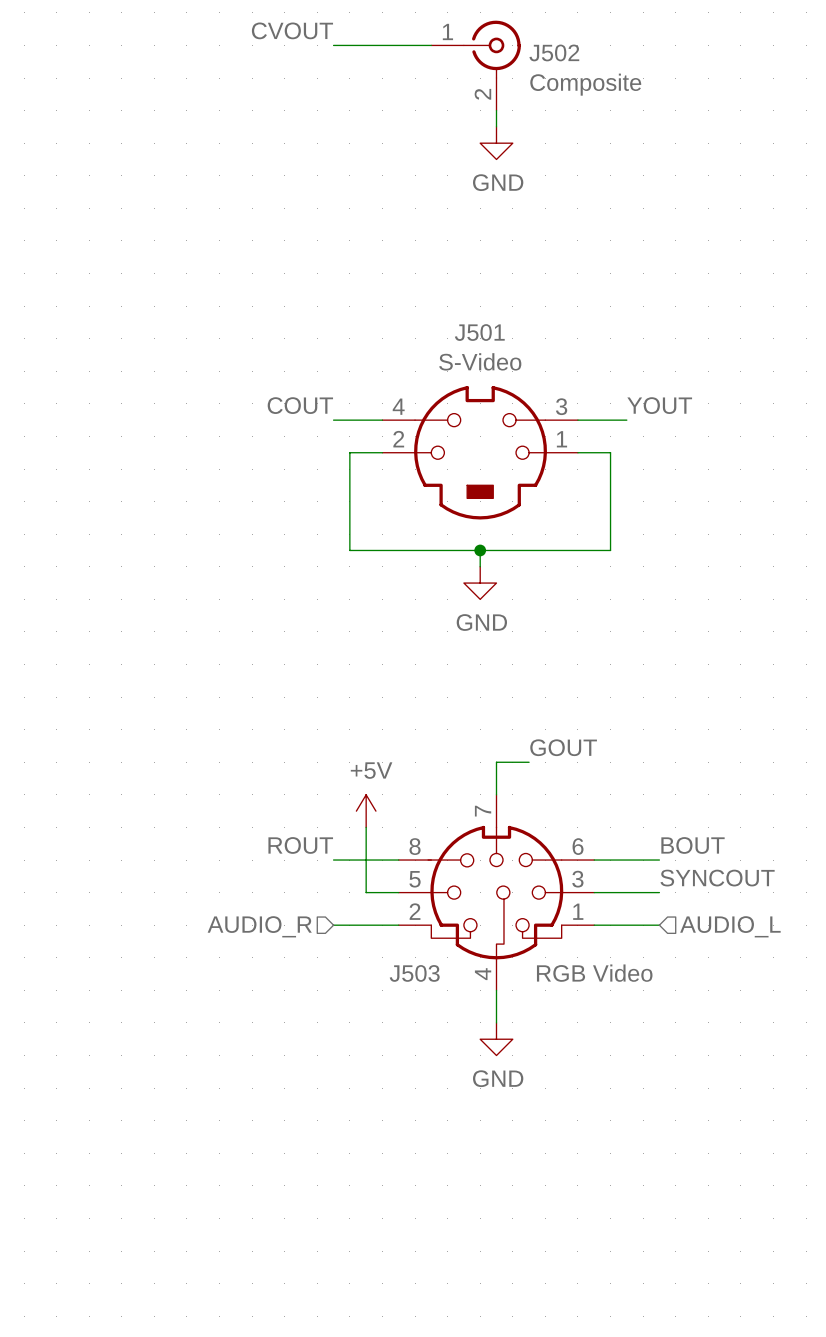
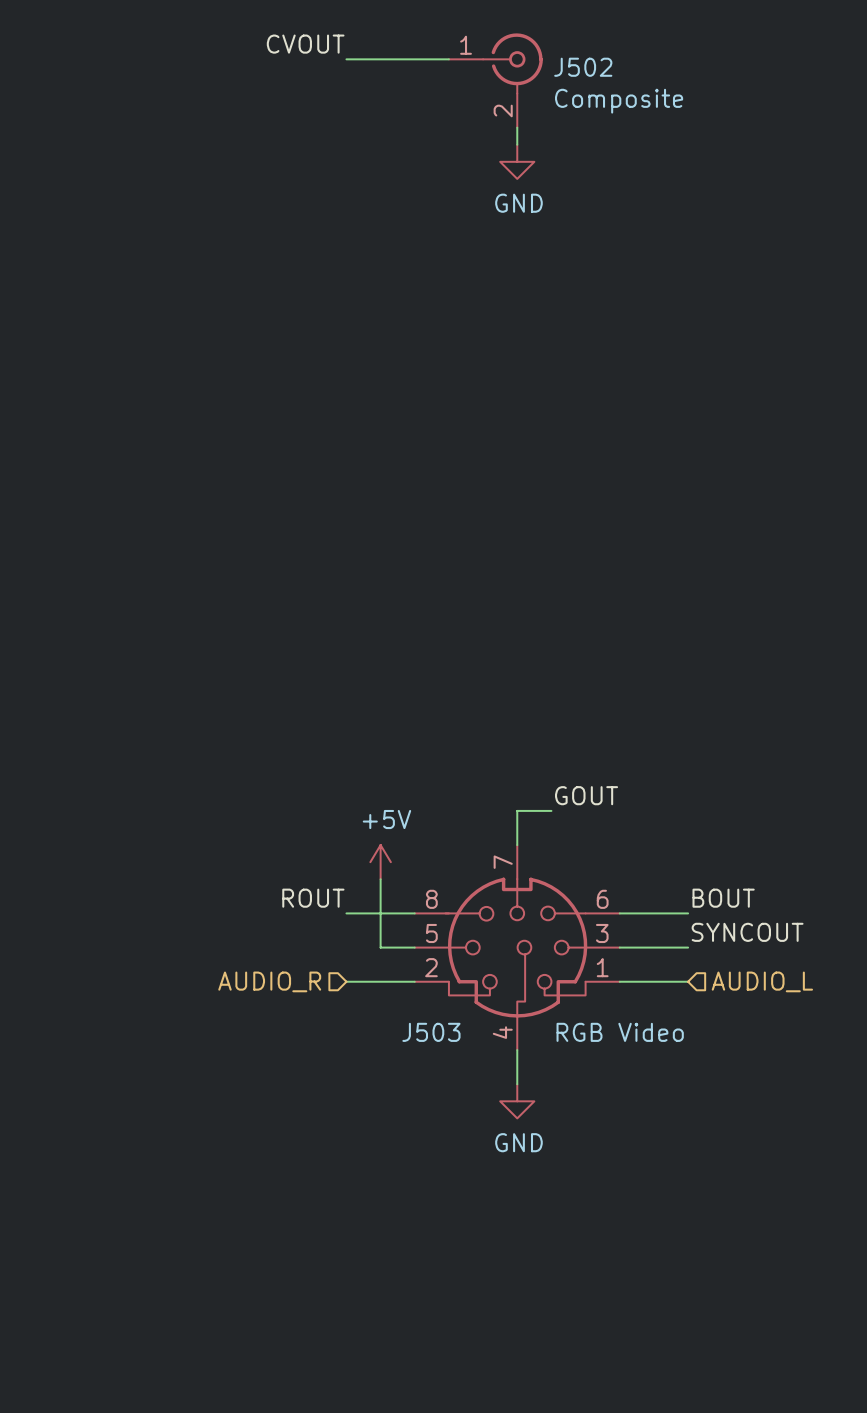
label: COUT (300, 405) -> none
label: YOUT (659, 405) -> none
wire: (333, 420) (382, 420) -> none
wire: (577, 420) (626, 420) -> none
wire: (382, 452) (349, 452) (349, 550) (610, 550) (610, 452) (577, 452) -> none
J501: S-Video (480, 452) -> none
wire: (480, 550) (480, 566) -> none
junction: (480, 550) -> none
power symbol: GND (480, 583) -> none

